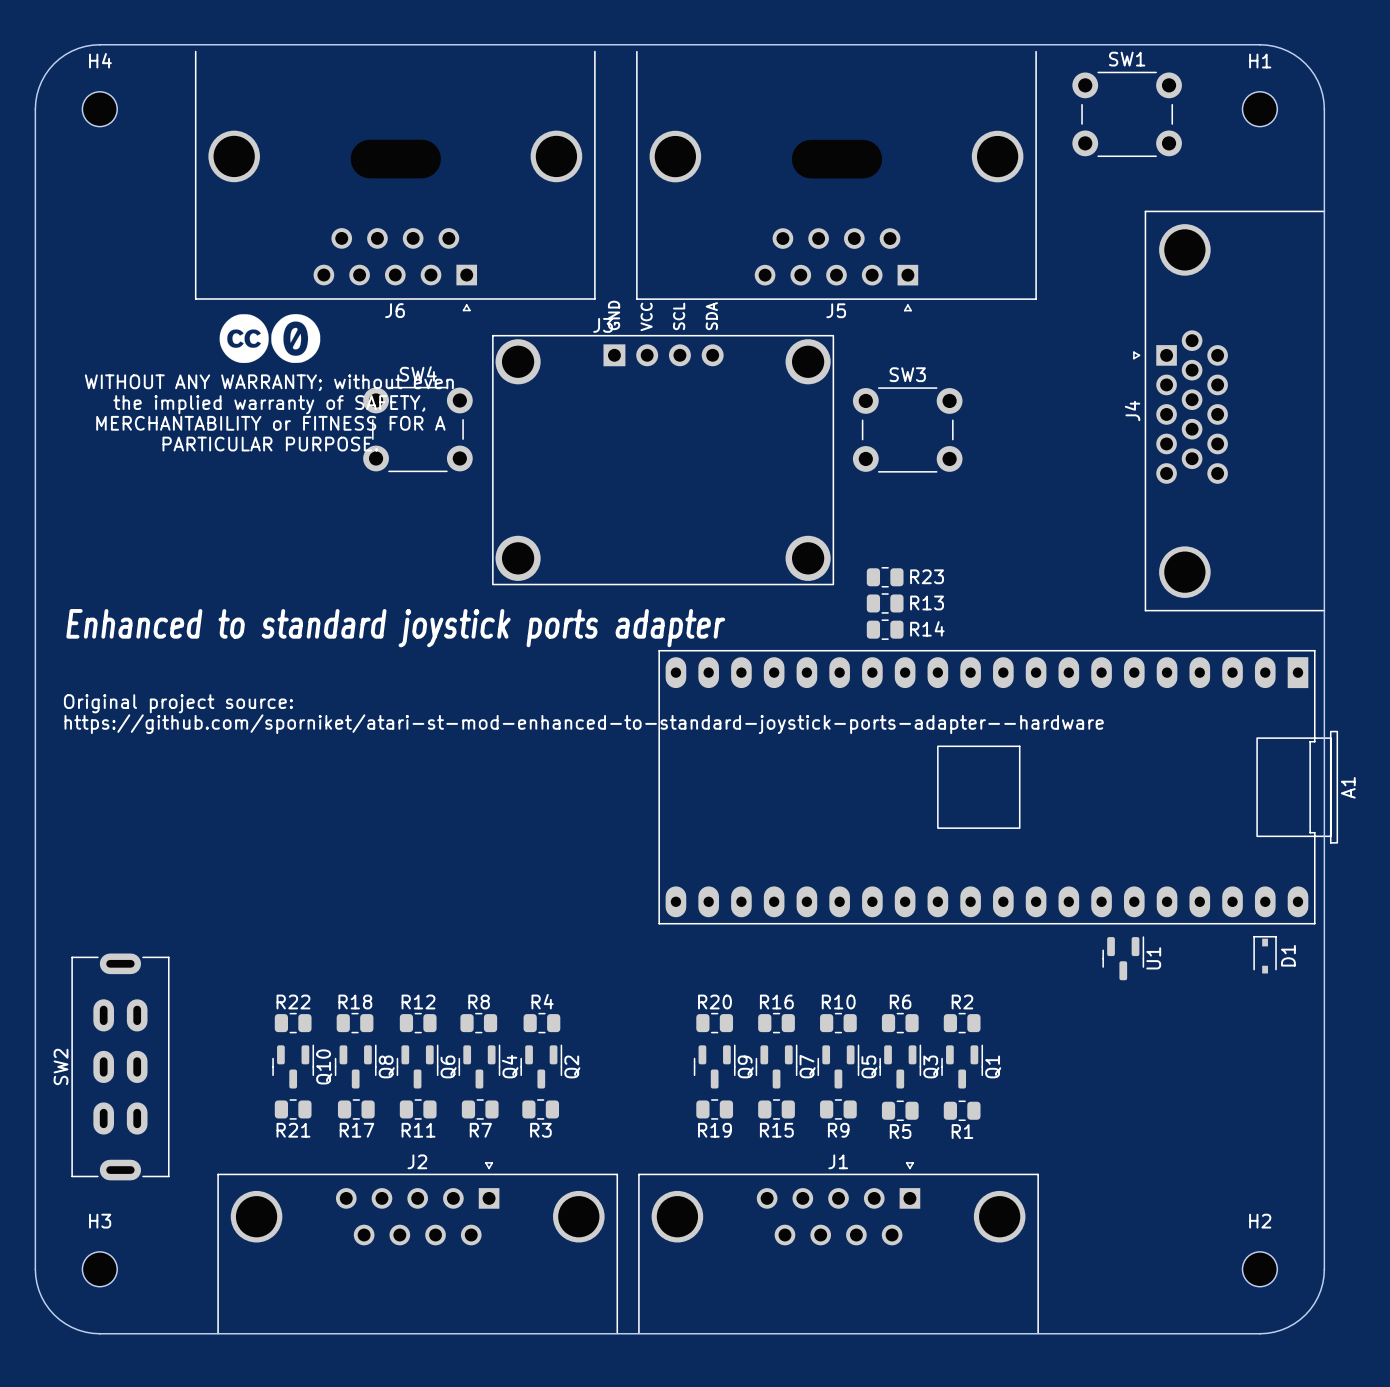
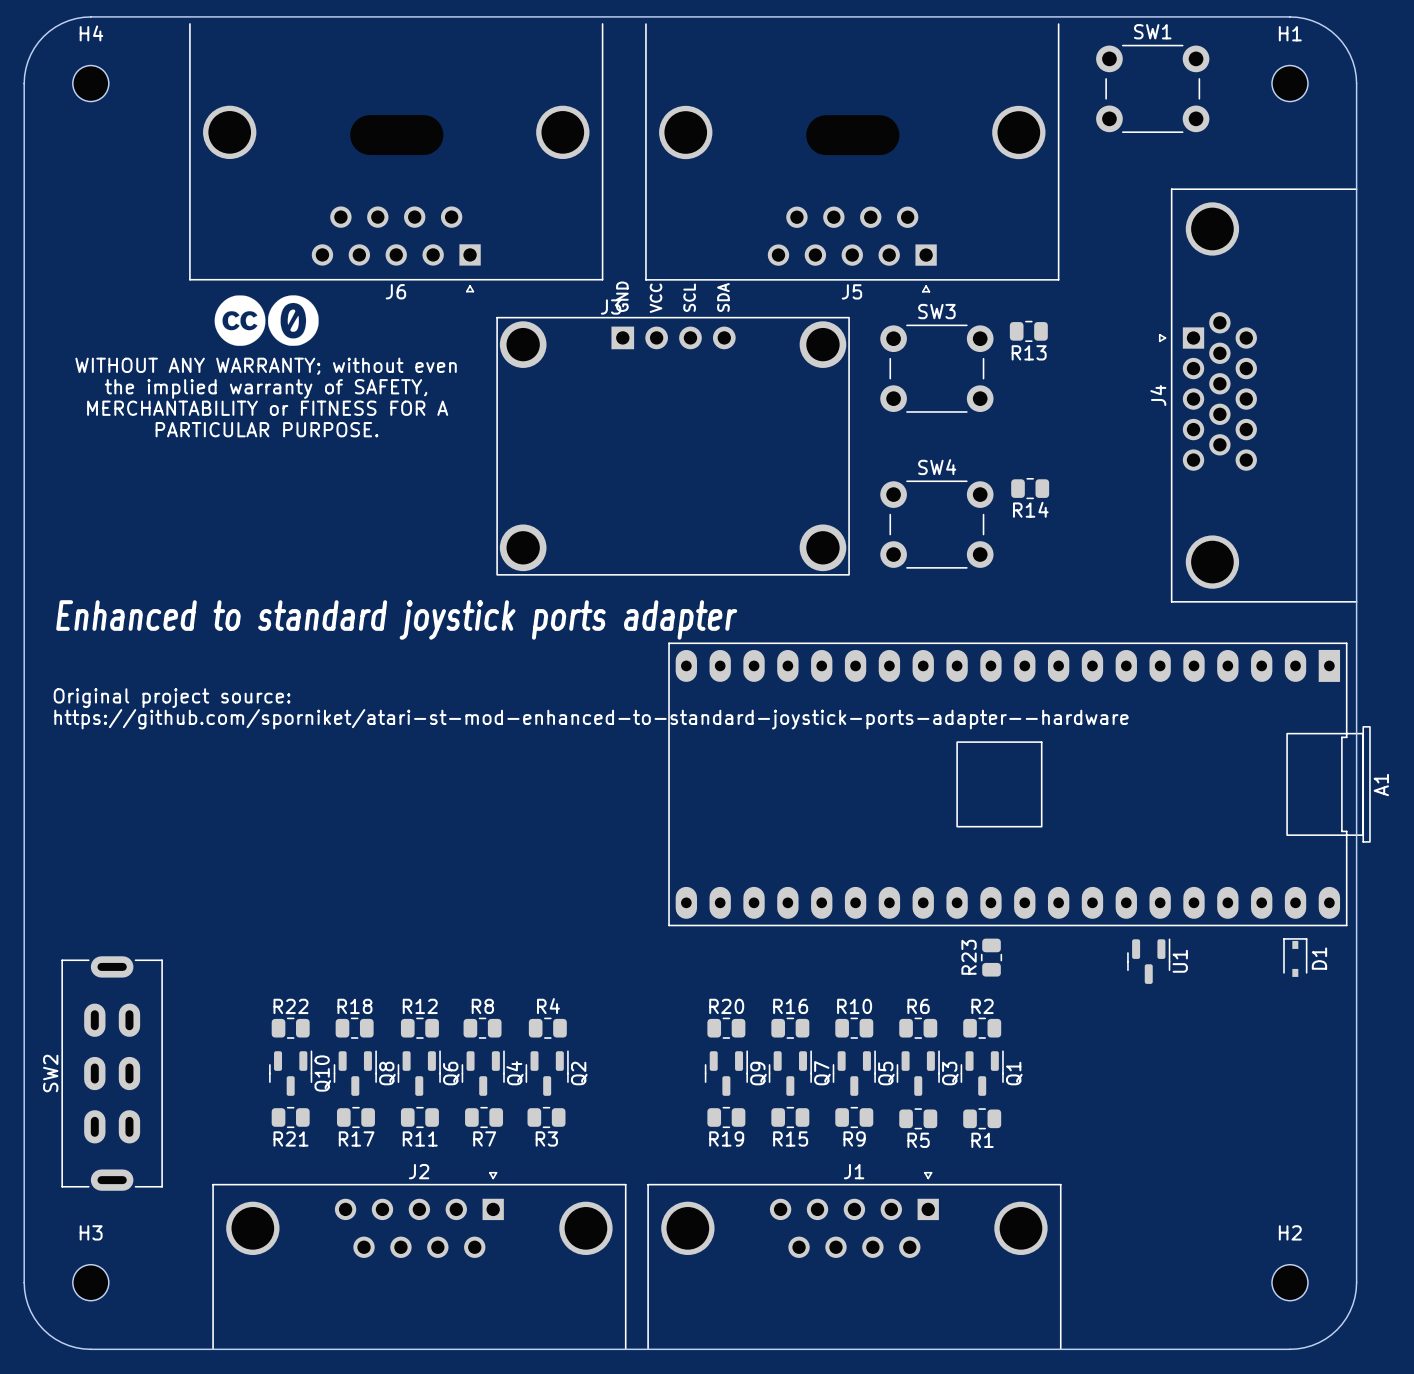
SW4 position: (417, 429) -> (936, 524)
SW3 position: (907, 429) -> (936, 368)
R23 name position: R23 (927, 576) -> R23 (969, 957)
R23 rotation: 0° (885, 577) -> 90° clockwise (991, 957)
R23 position: (885, 577) -> (991, 957)
R13 name position: R13 (927, 602) -> R13 (1029, 352)
R13 position: (885, 603) -> (1028, 331)
R14 name position: R14 (927, 628) -> R14 (1030, 509)
R14 position: (885, 629) -> (1030, 488)

